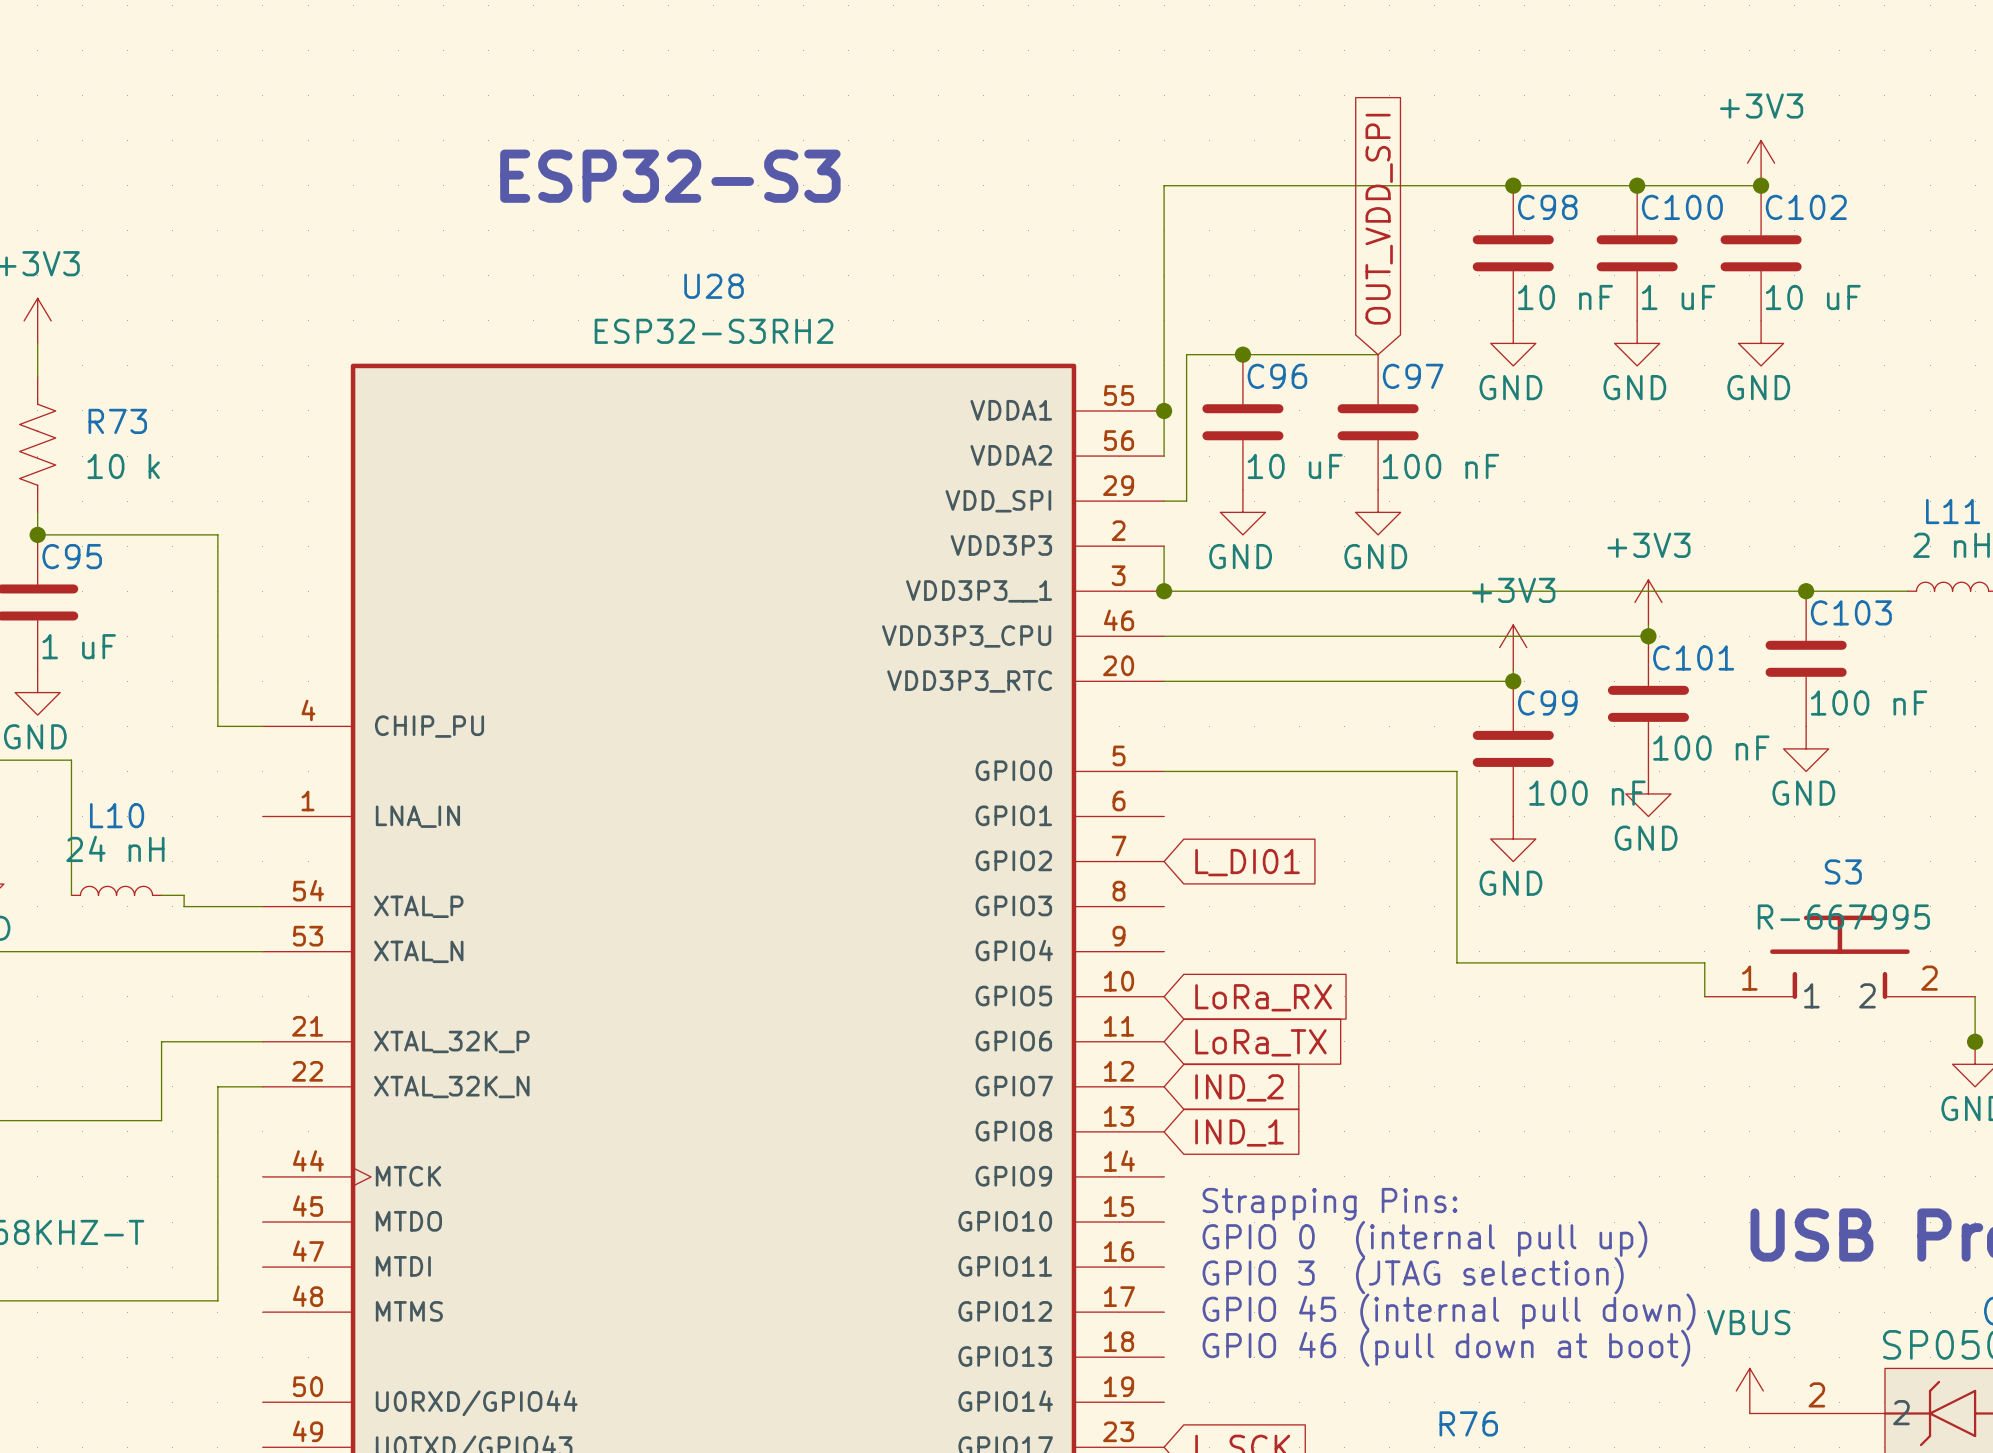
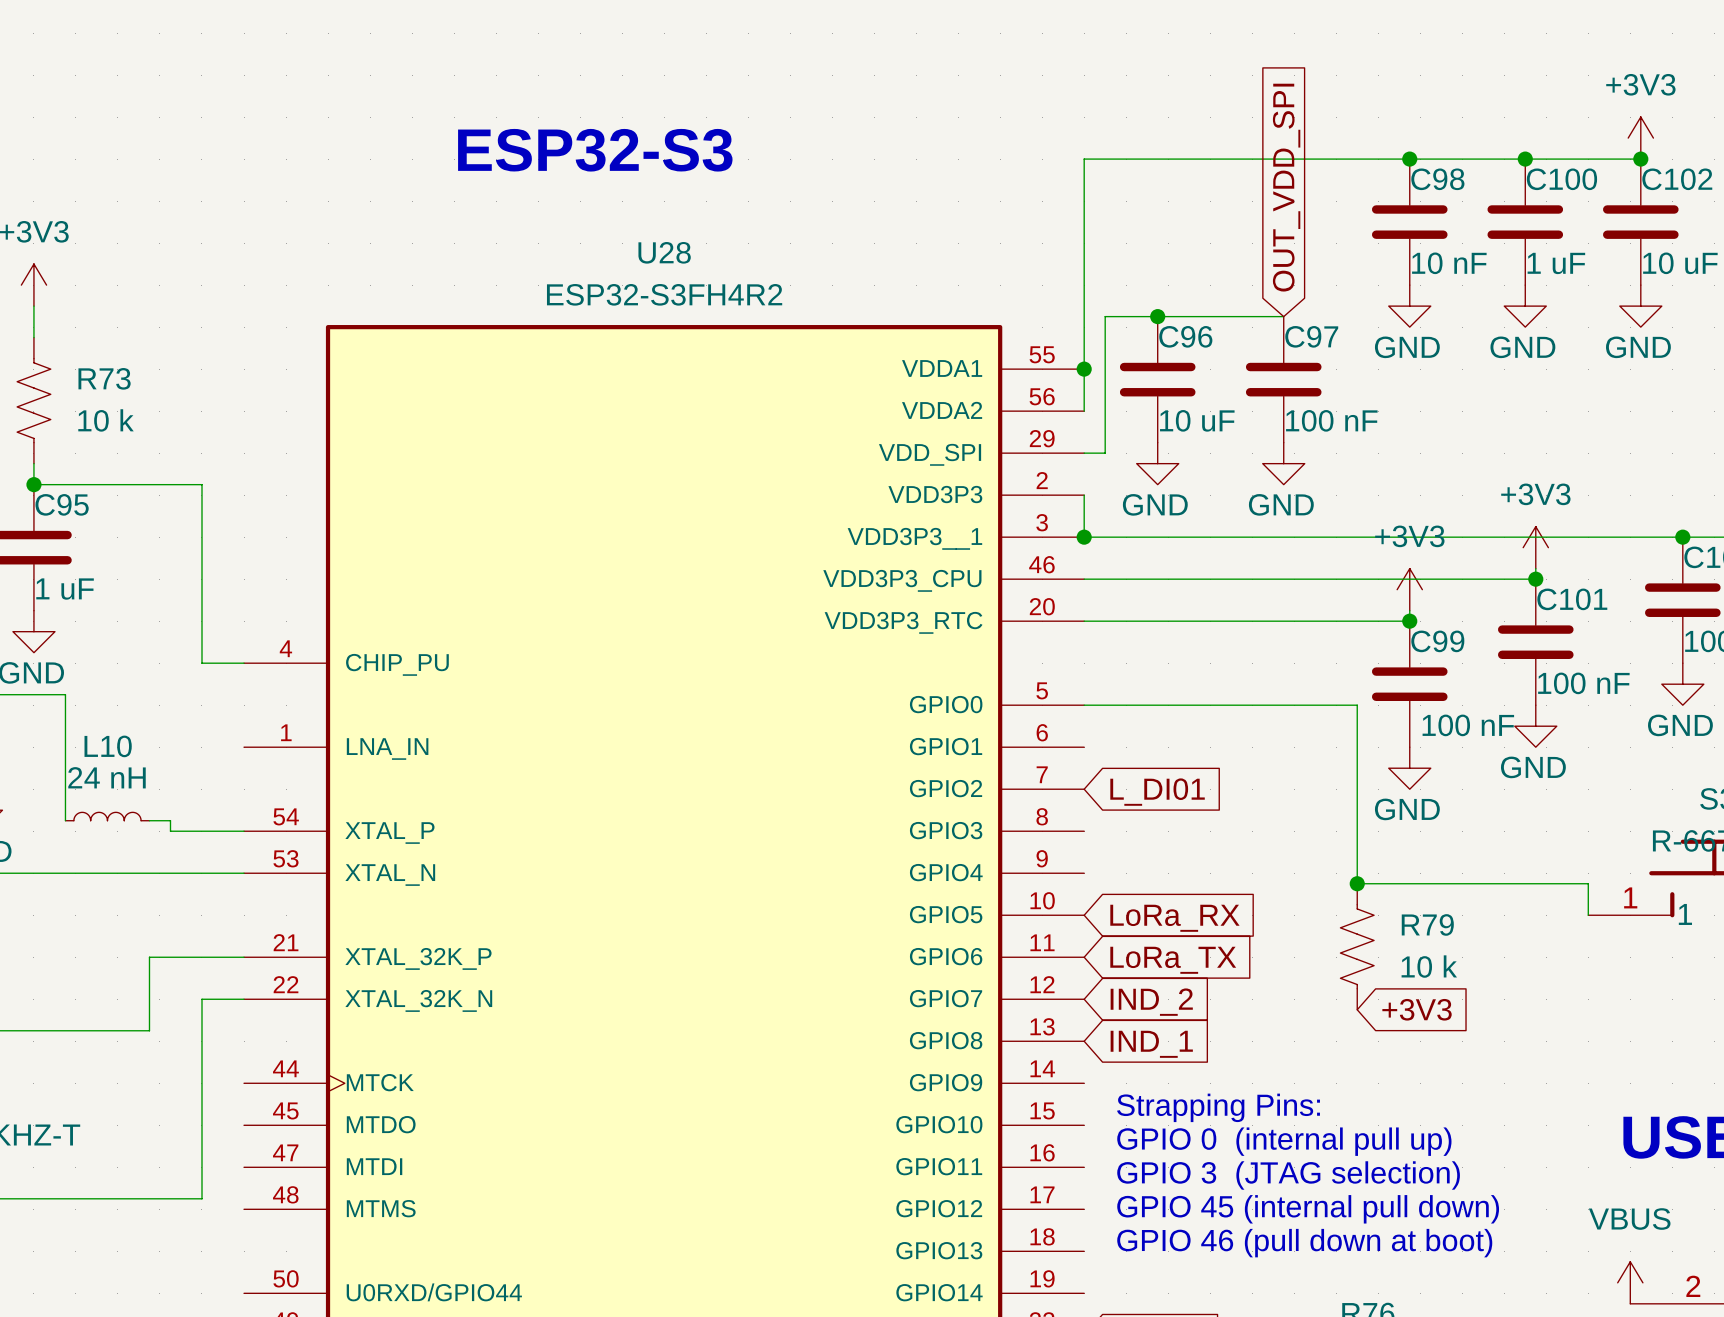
U28 value: ESP32-S3RH2 (714, 331) -> ESP32-S3FH4R2 (664, 294)
junction: none -> (1357, 883)
R79: none -> 10 k (1357, 946)
global label: none -> +3V3 (1417, 1009)

